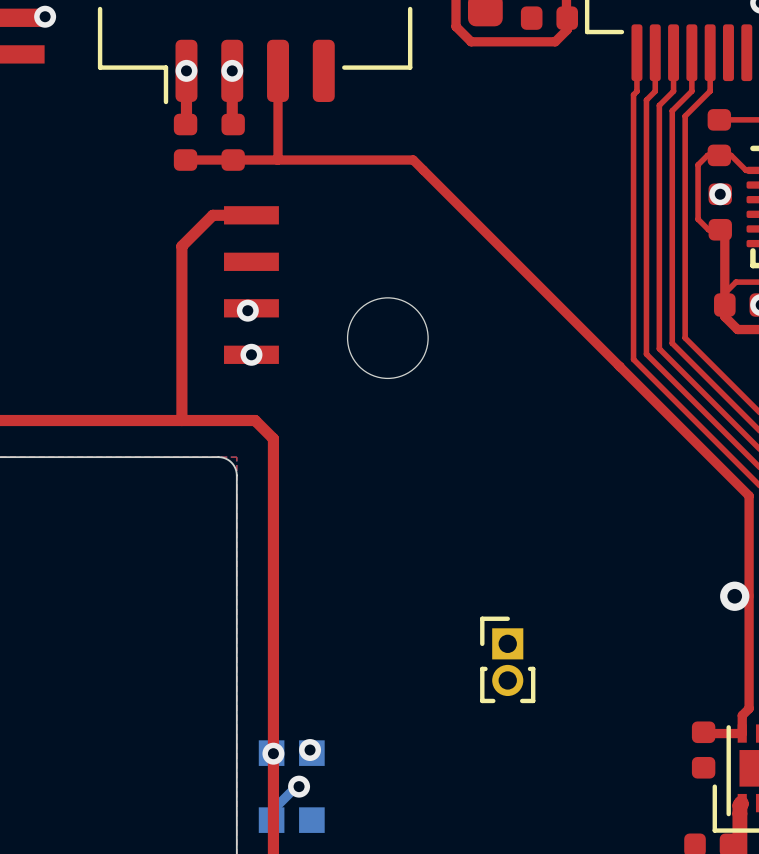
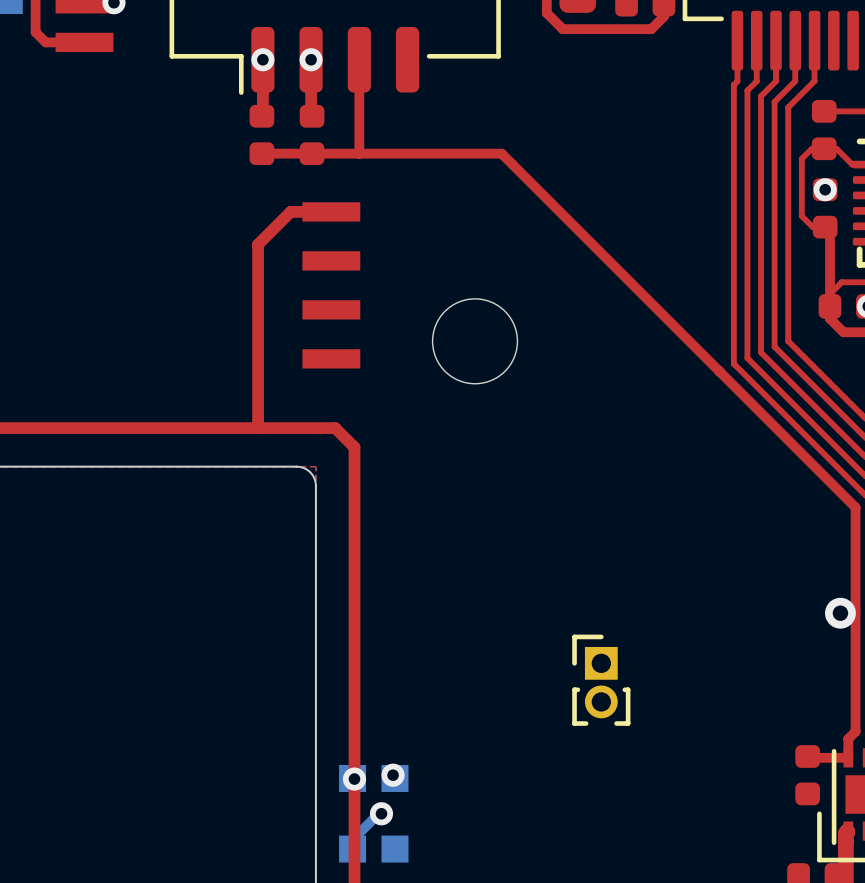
via: (247, 310) -> none
via: (251, 354) -> none

